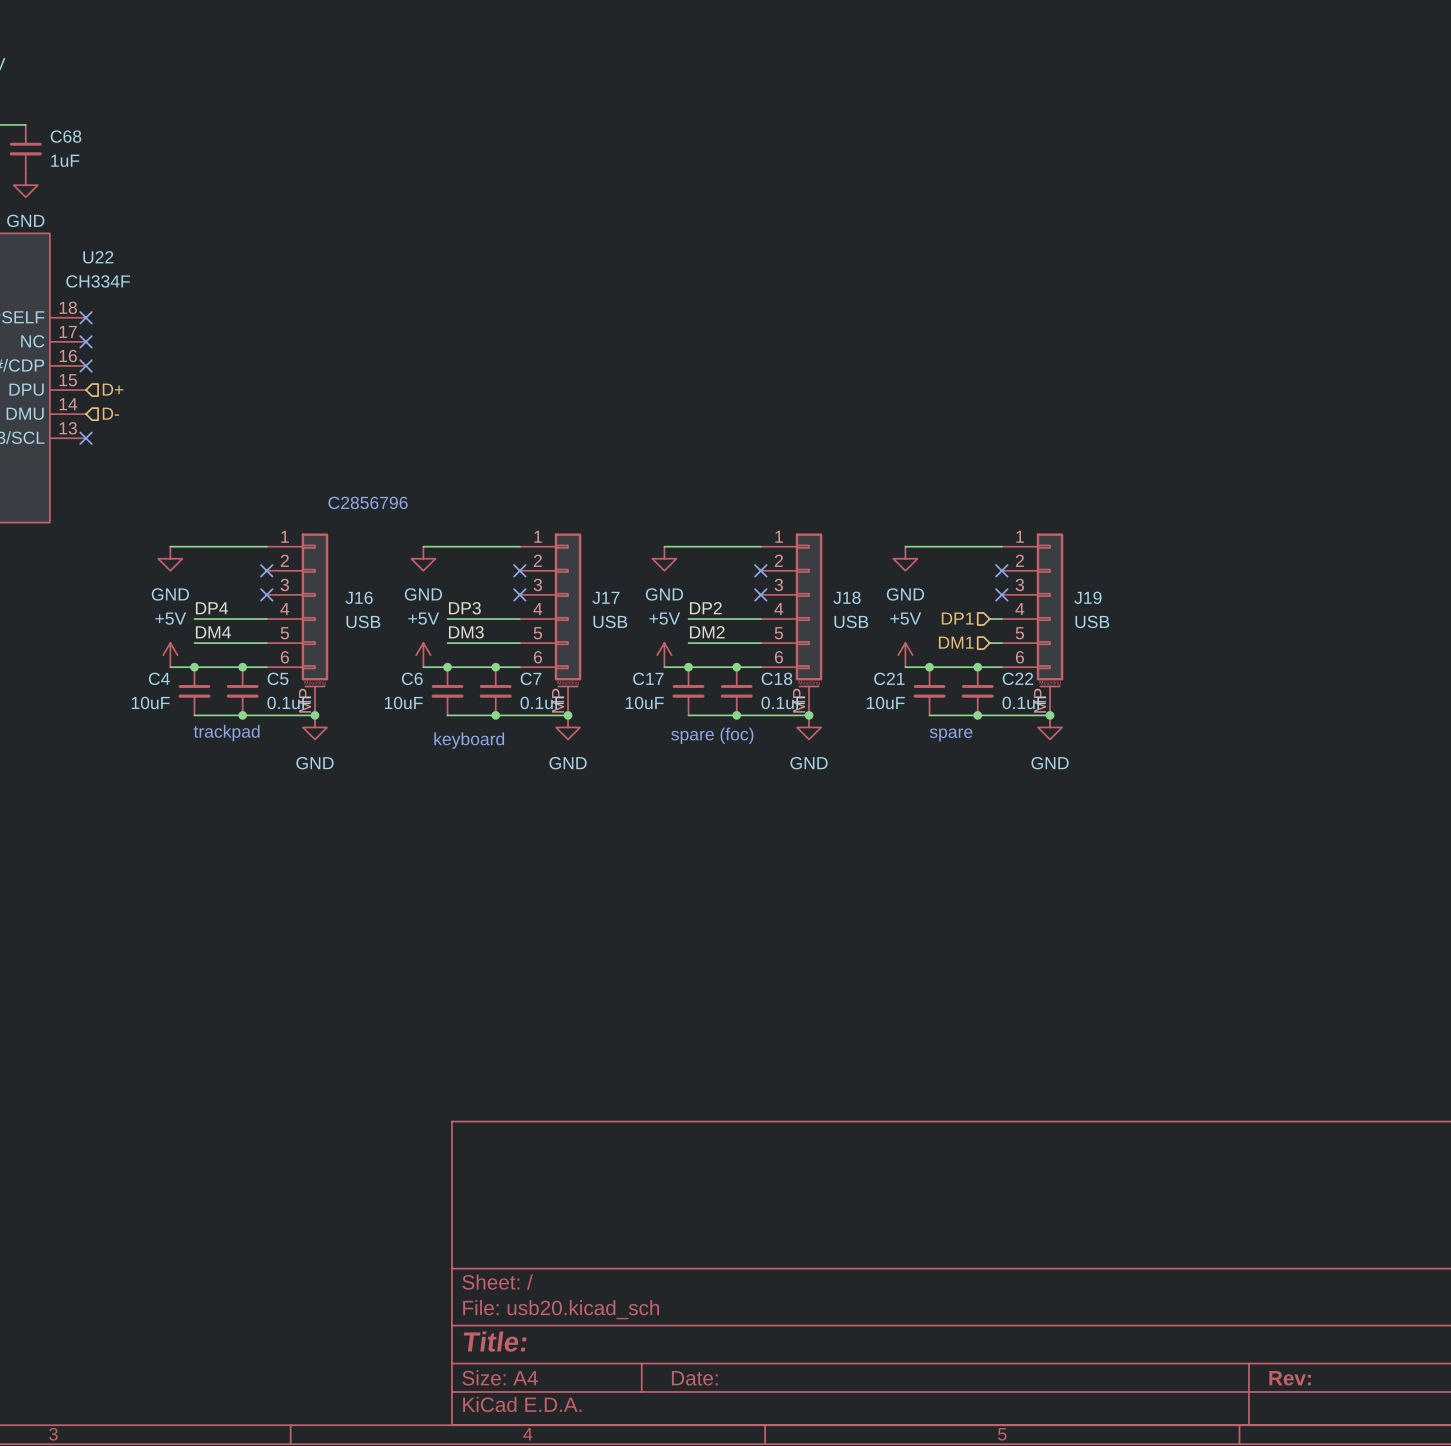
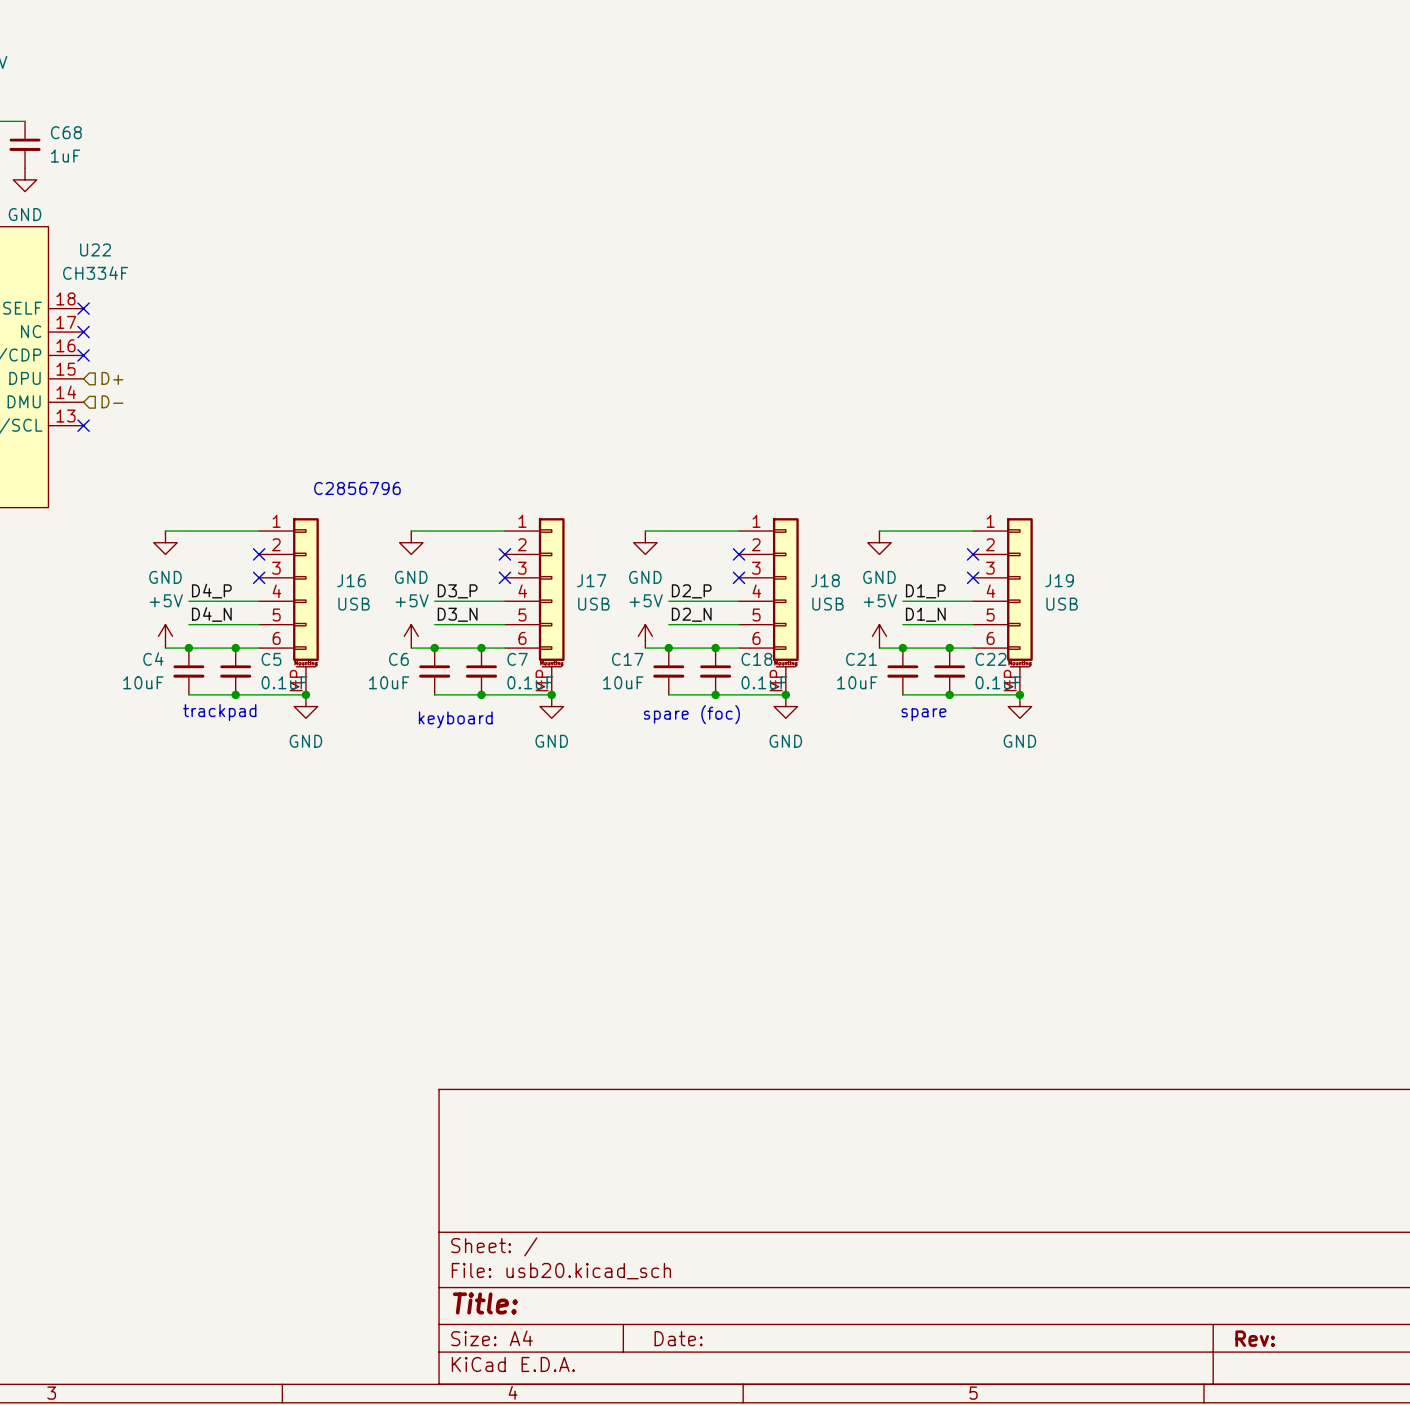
label: DP4 (211, 608) -> D4_P (211, 591)
label: DP3 (464, 608) -> D3_P (457, 591)
label: DP2 (705, 608) -> D2_P (691, 591)
label: none -> D1_P (925, 591)
wire: none -> (902, 601) (961, 601)
hierarchical label: DP1 (957, 618) -> none
label: DM4 (213, 632) -> D4_N (211, 614)
label: DM3 (466, 632) -> D3_N (457, 614)
label: DM2 (707, 632) -> D2_N (691, 614)
label: none -> D1_N (925, 614)
hierarchical label: DM1 (956, 642) -> none
wire: none -> (902, 624) (961, 624)

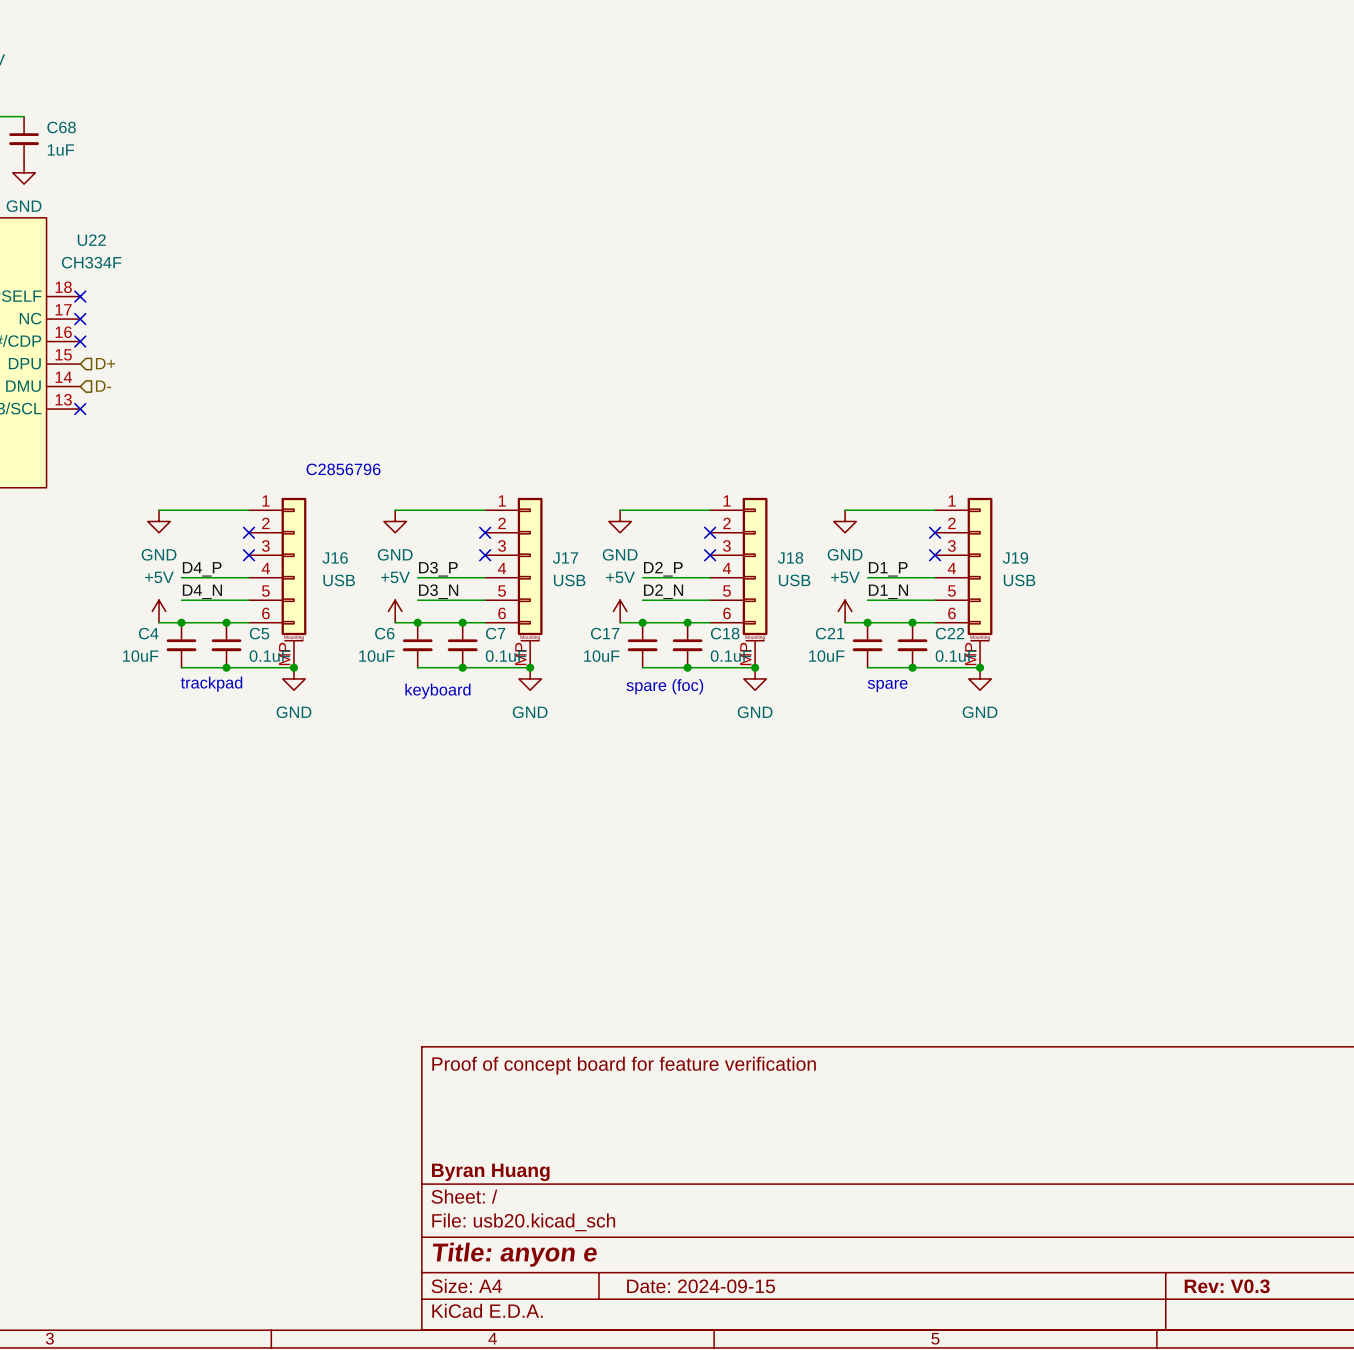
title block: none -> Proof of concept board for feature verification (624, 1065)
title block: none -> Byran Huang (490, 1172)
title block: Title: (485, 1303) -> Title: anyon e (514, 1254)
title block: Date: (678, 1338) -> Date: 2024-09-15 (701, 1286)
title block: Rev: (1255, 1338) -> Rev: V0.3 (1227, 1286)

